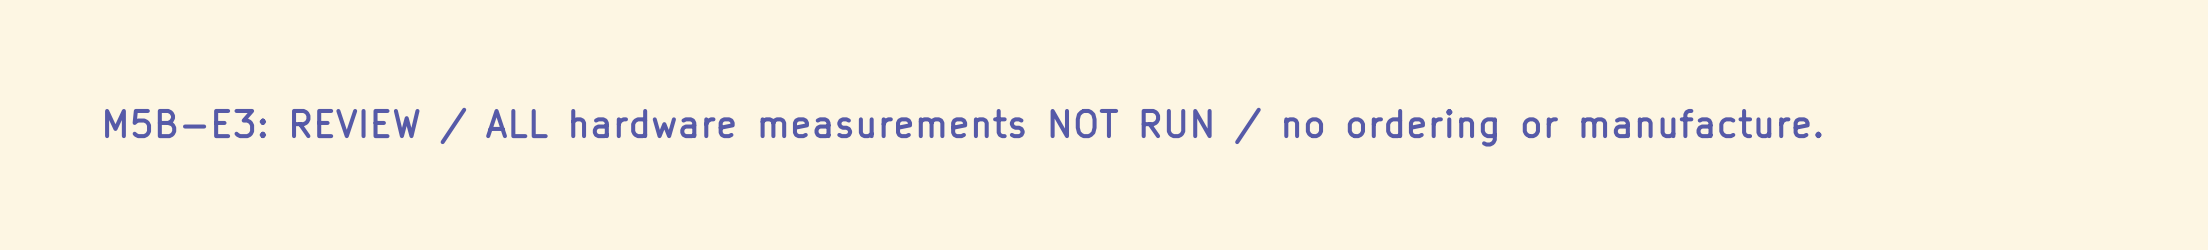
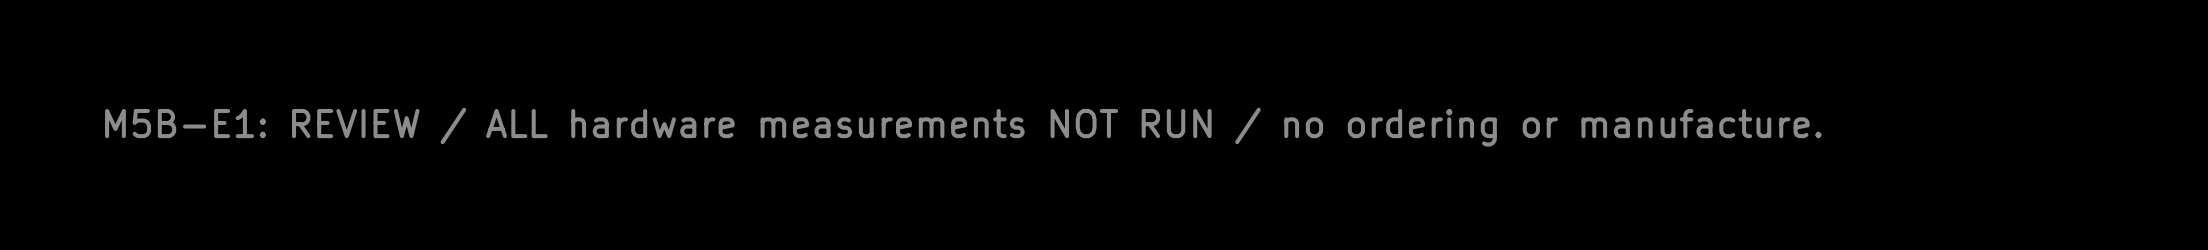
text: M5B-E3: REVIEW / ALL hardware measurements NOT RUN / no ordering or manufacture. (963, 127) -> M5B-E1: REVIEW / ALL hardware measurements NOT RUN / no ordering or manufacture. (963, 127)

